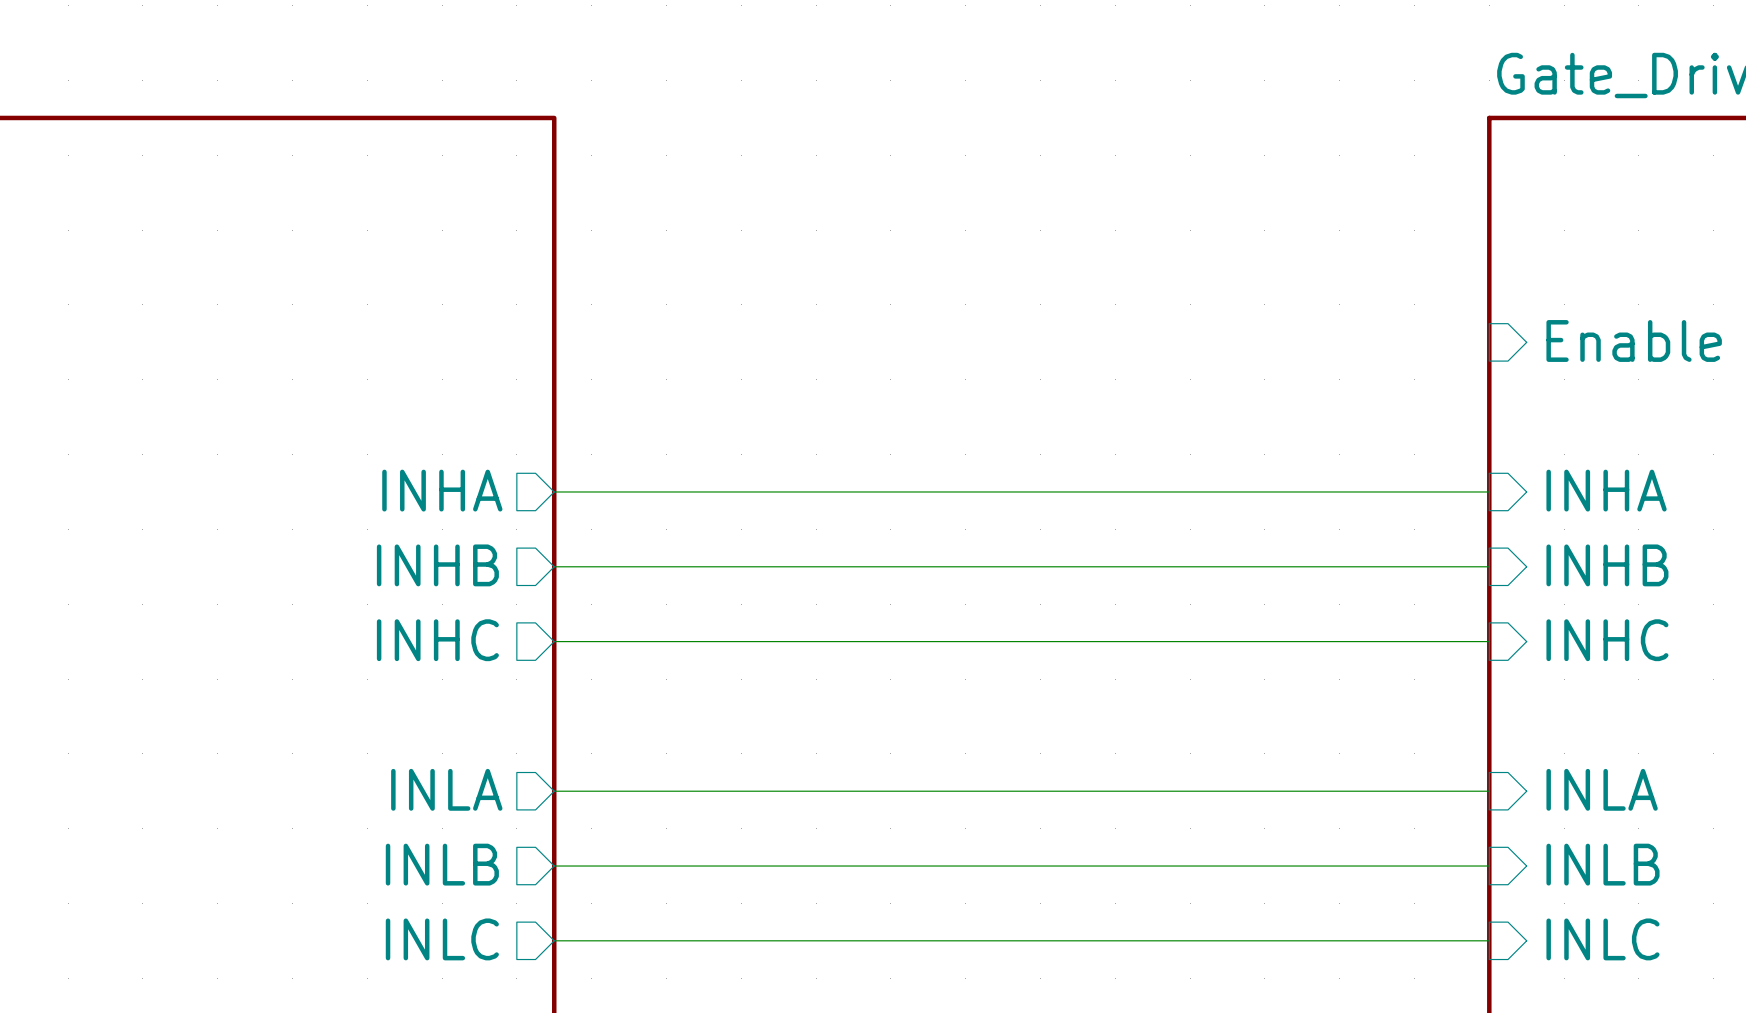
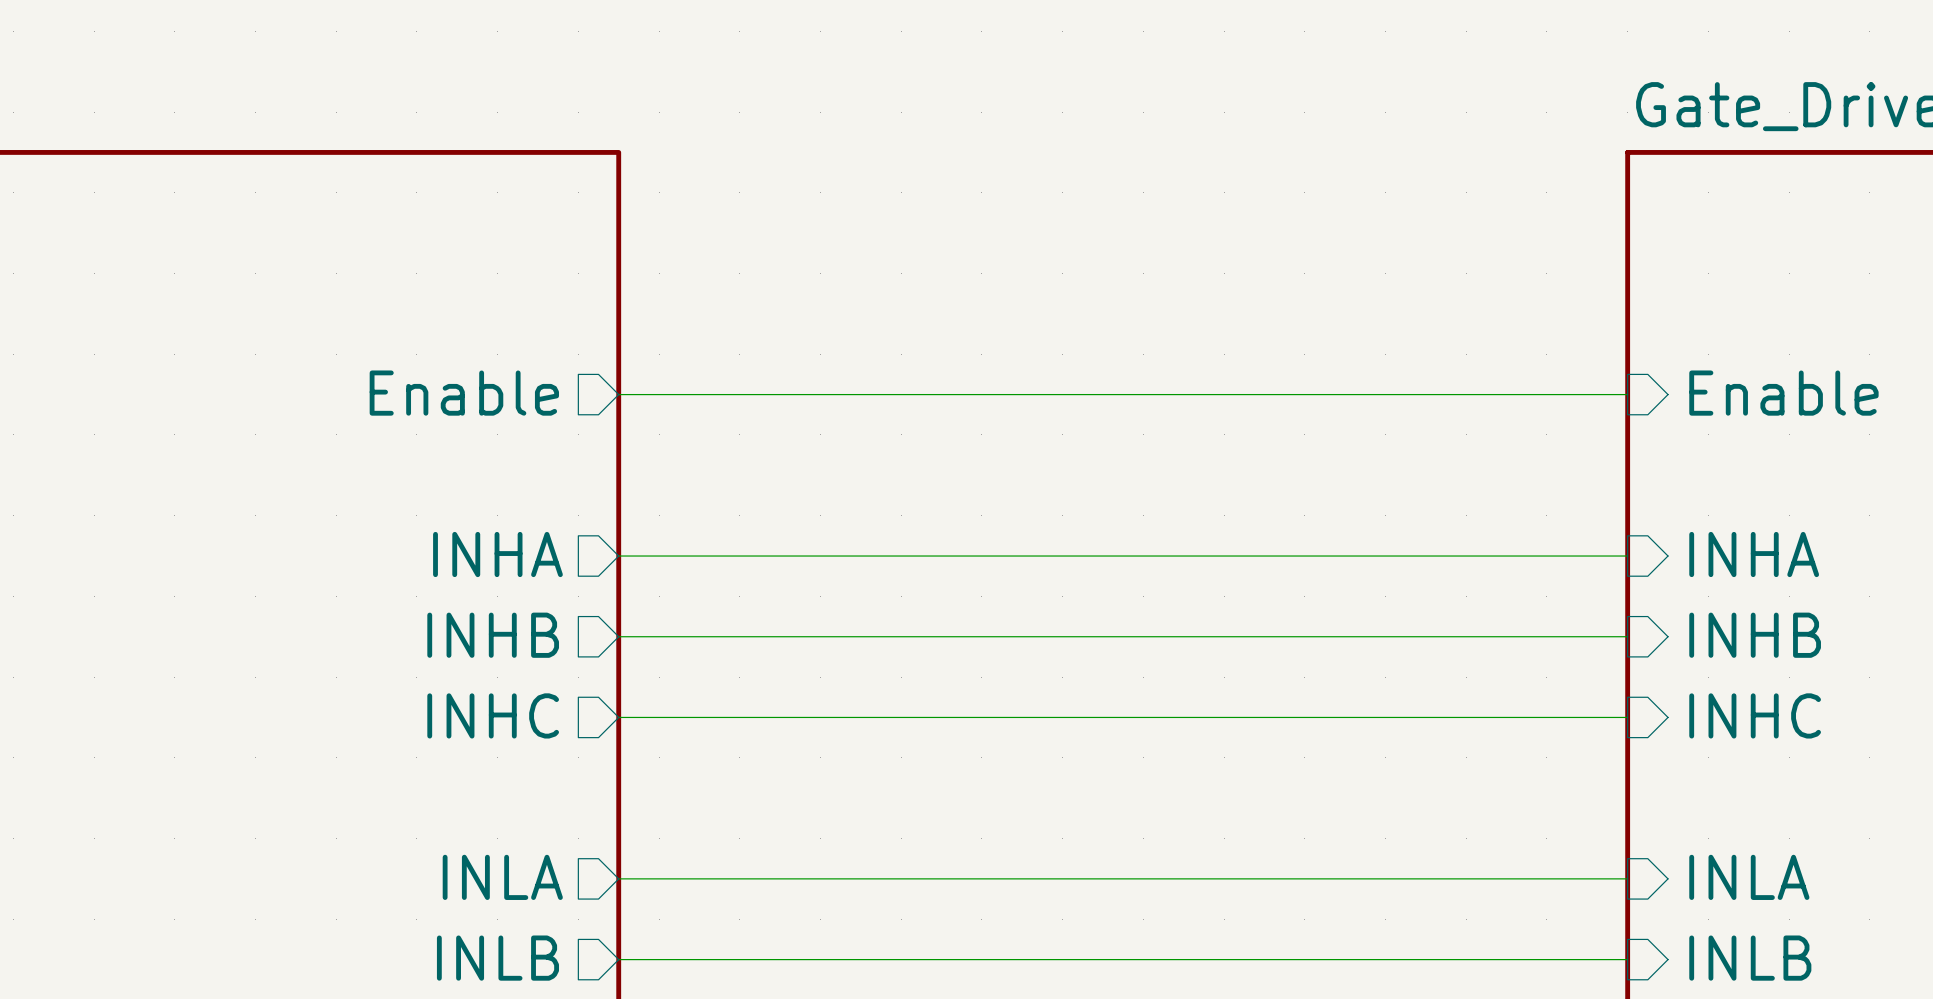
sheet pin: none -> Enable (464, 393)
wire: none -> (618, 394) (1627, 394)

